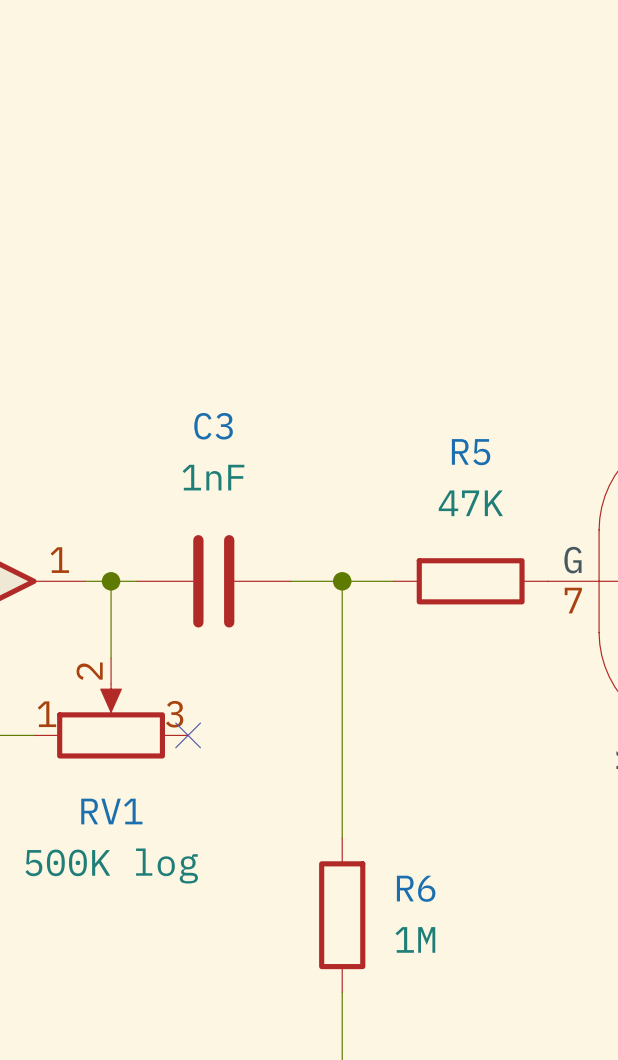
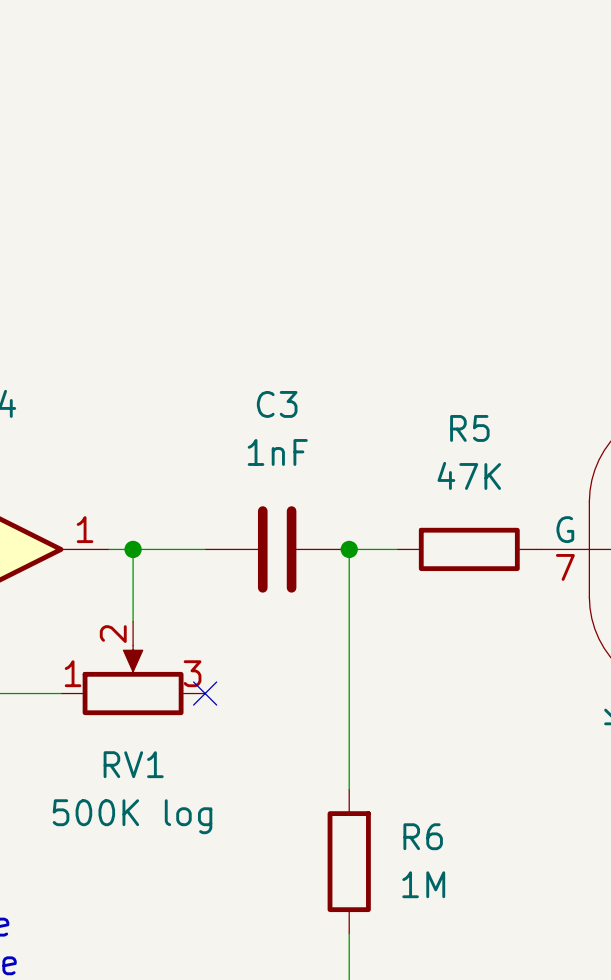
C3 position: (213, 581) -> (277, 549)

